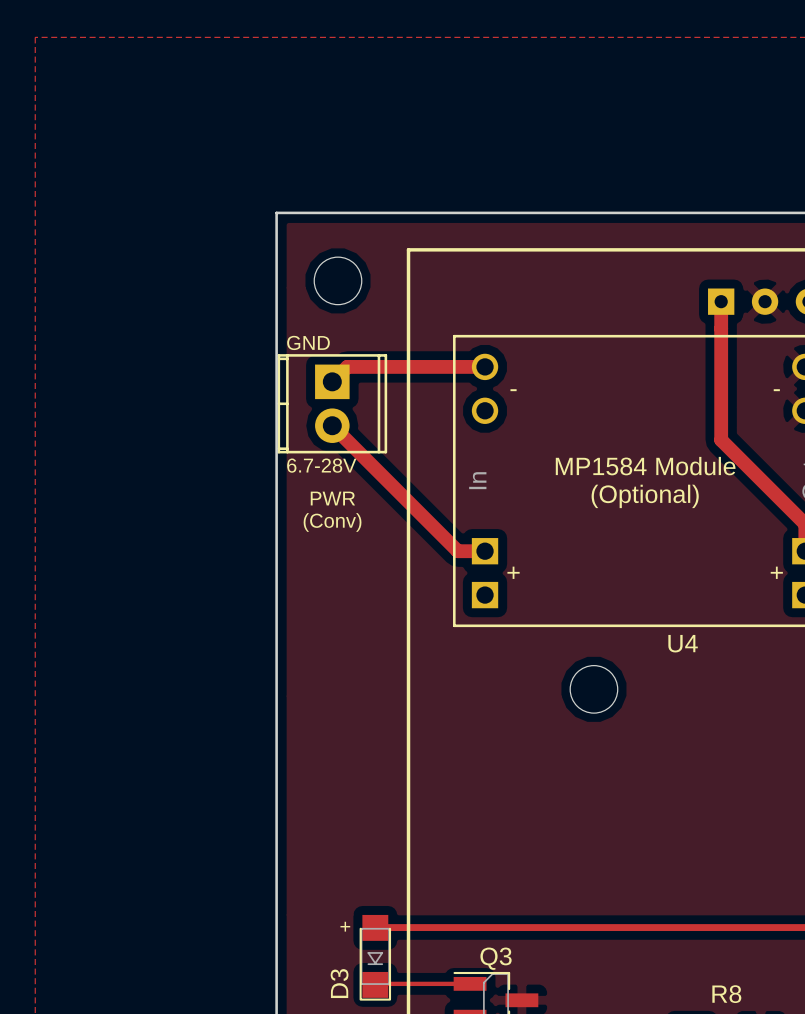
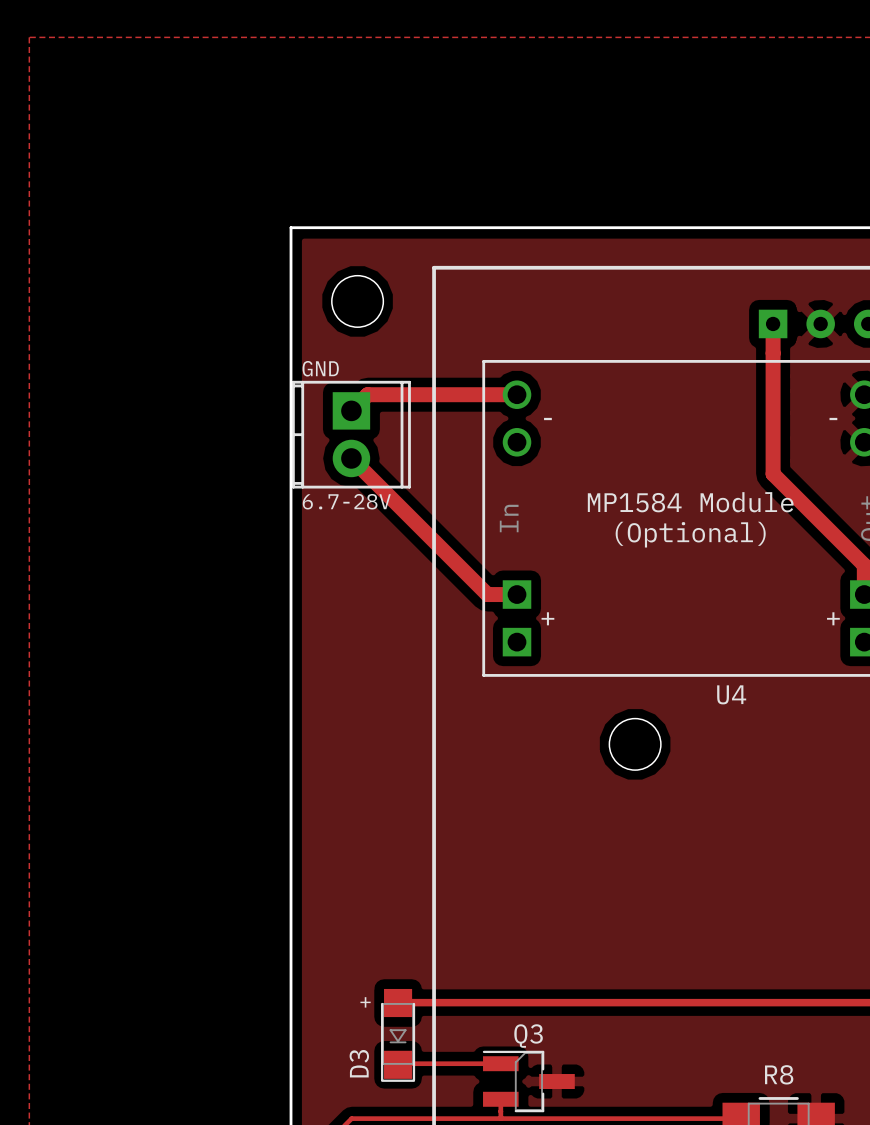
text: PWR (332, 498) -> none
text: (Conv) (332, 522) -> none

